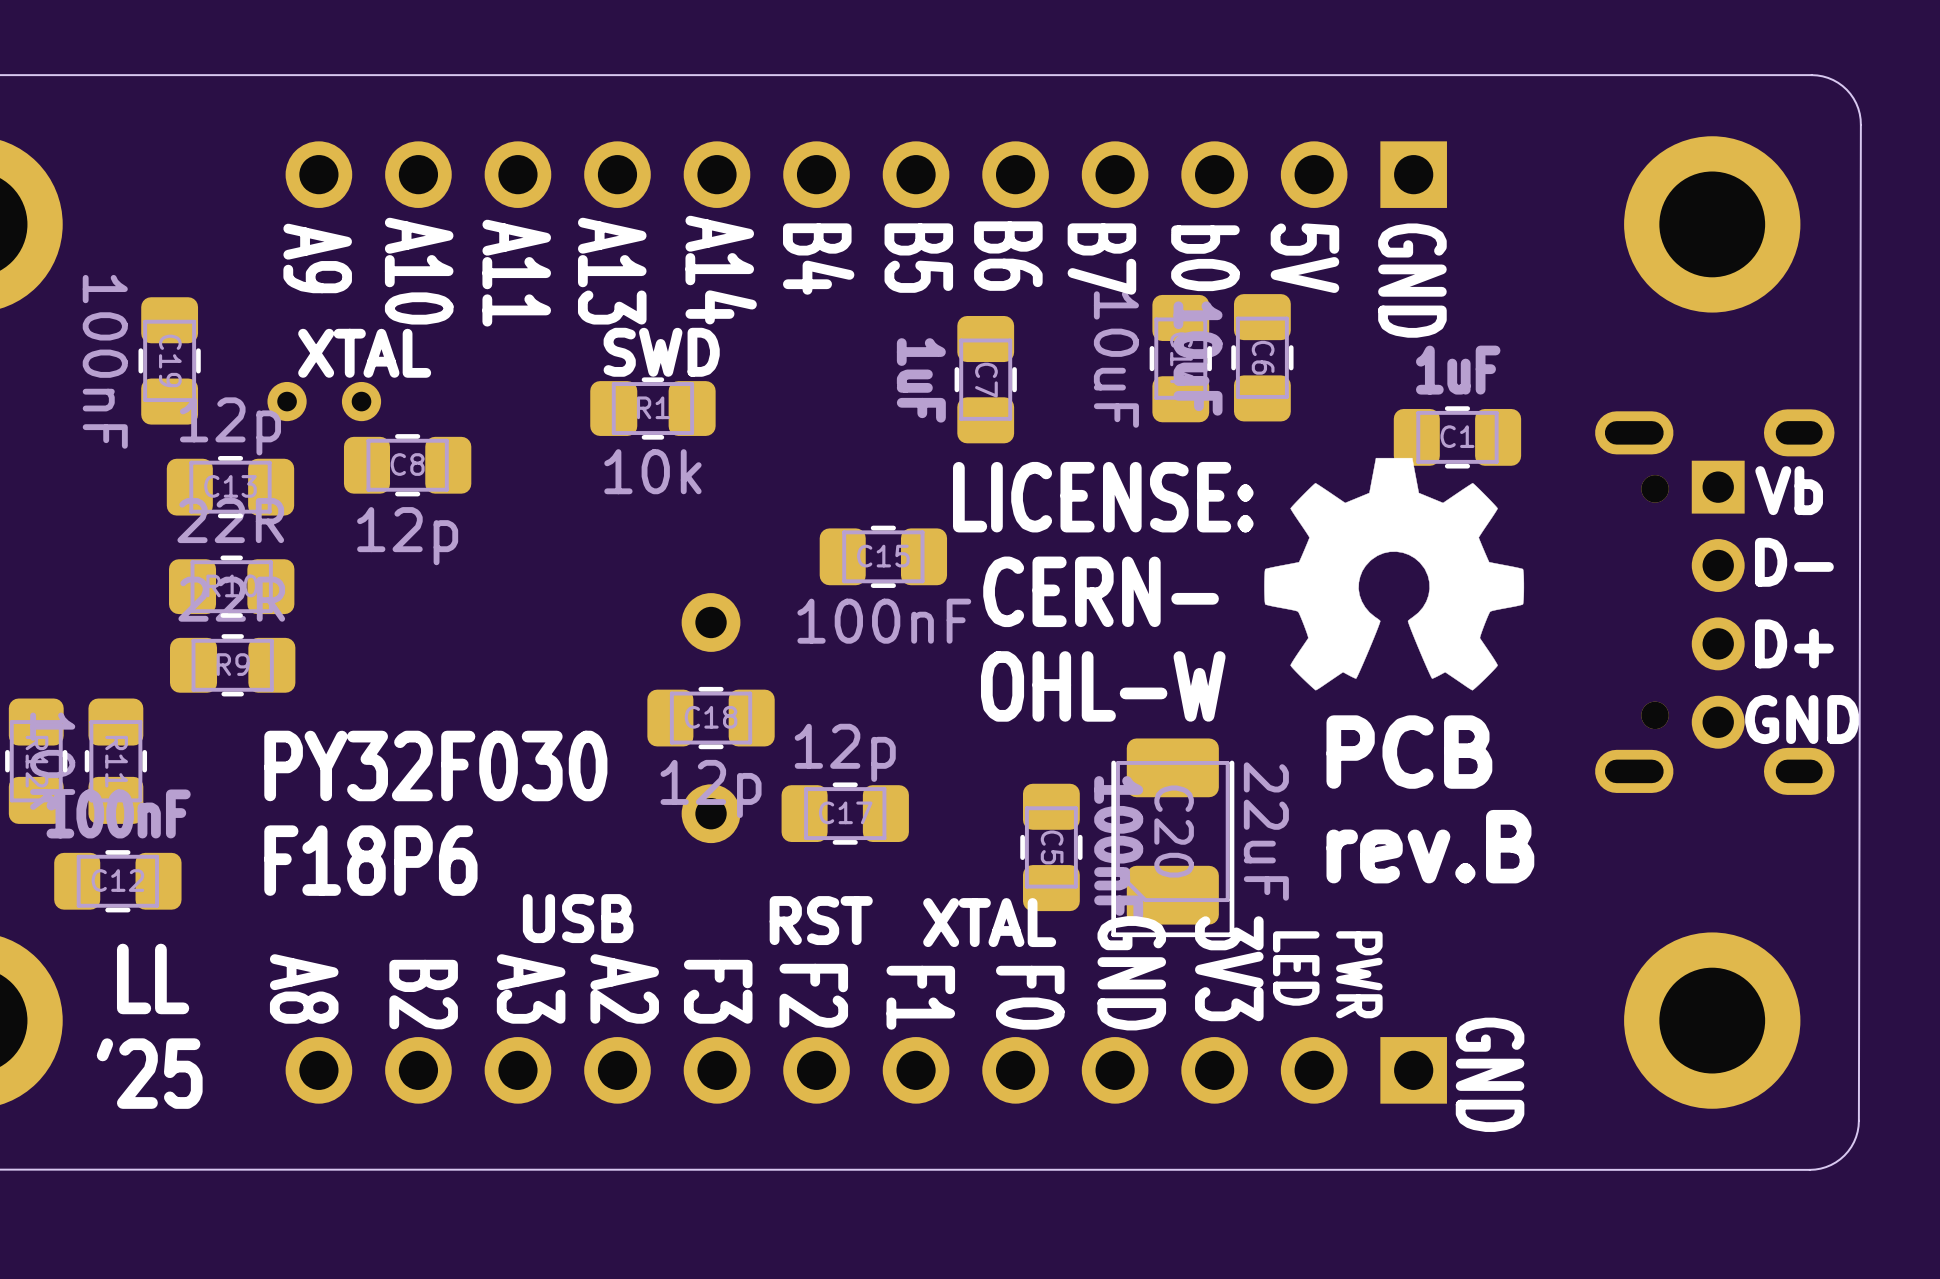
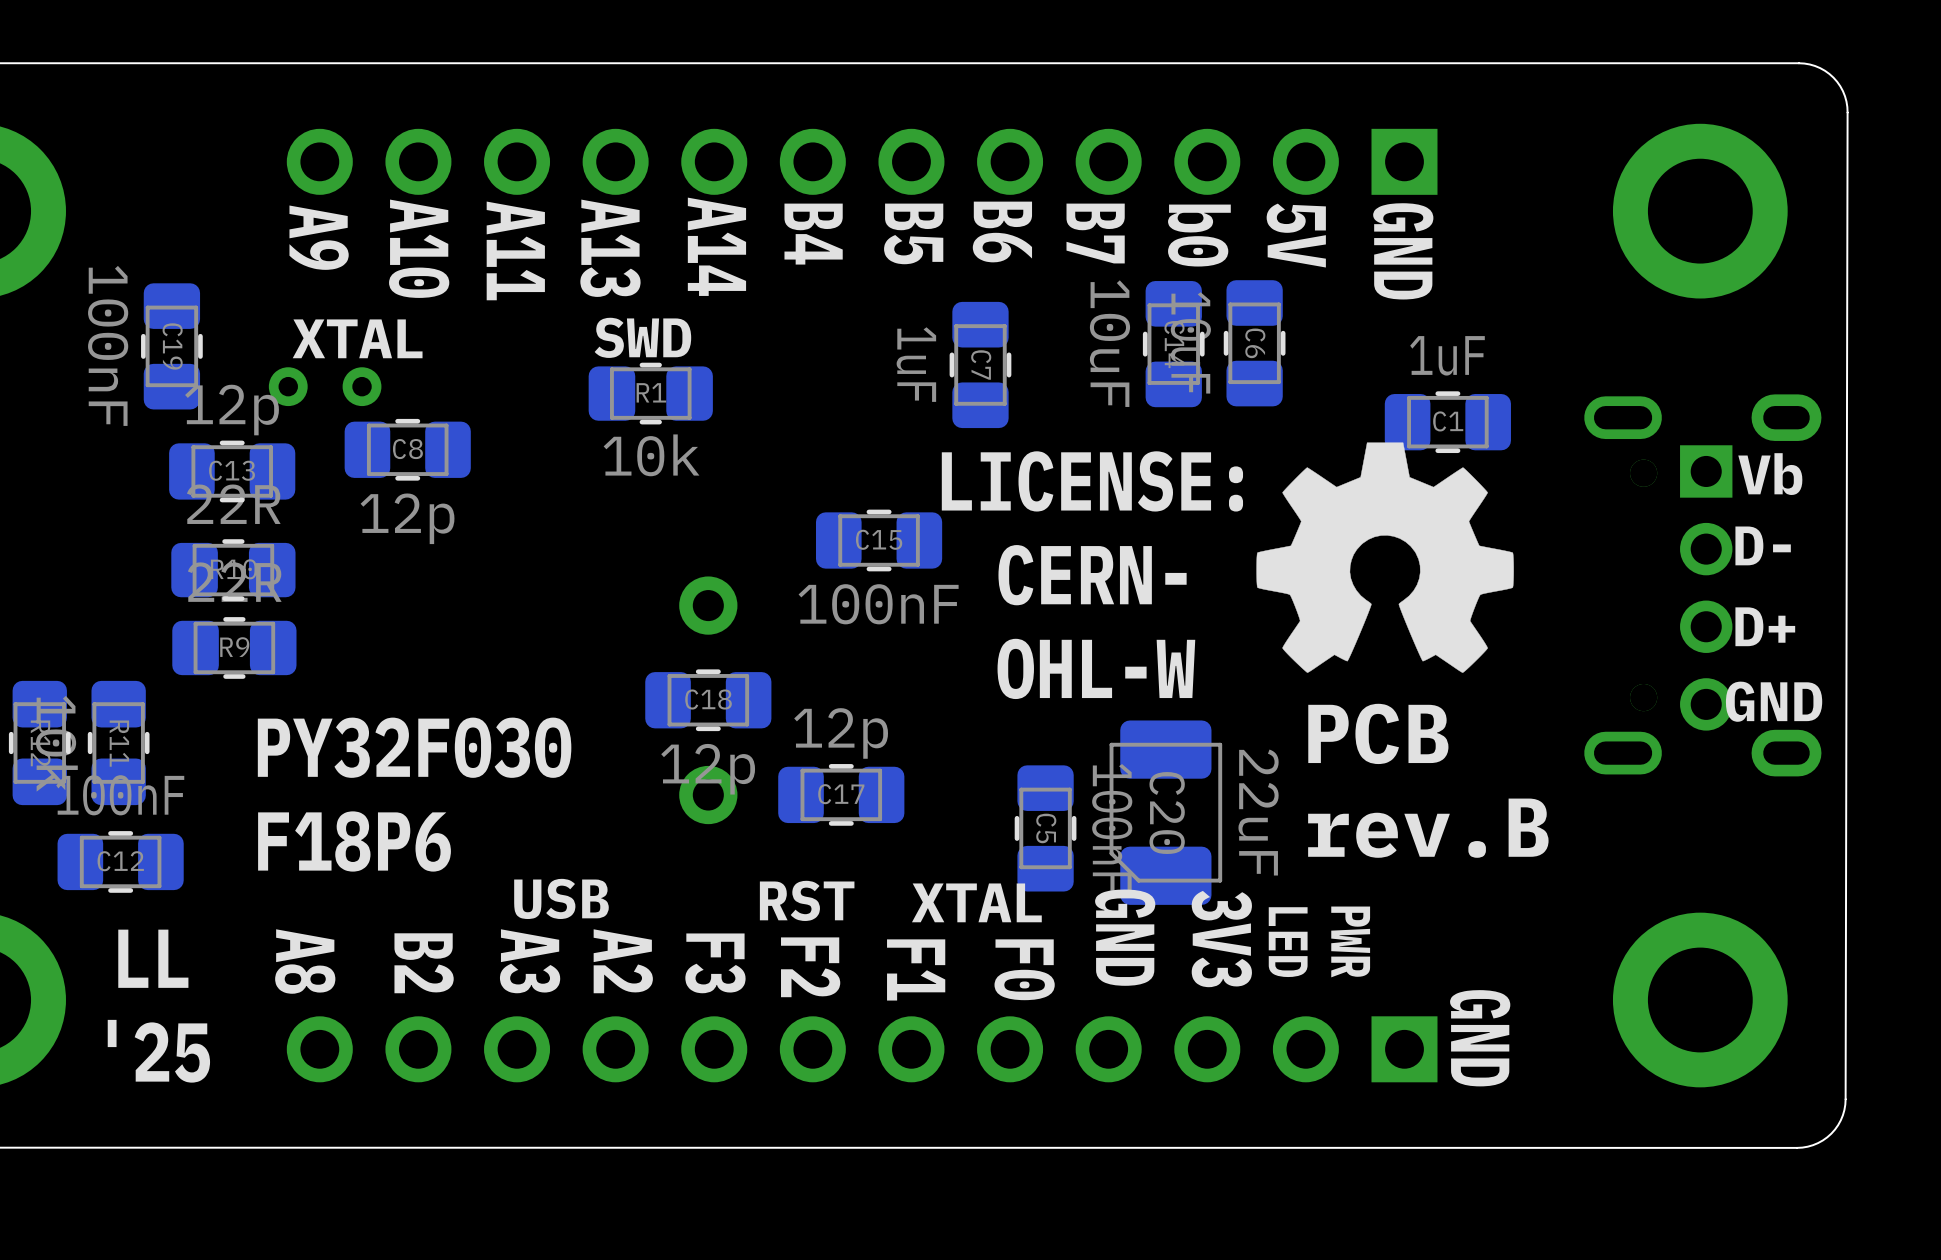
C20 footprint: [1111, 738, 1235, 938] -> [1109, 720, 1223, 905]

